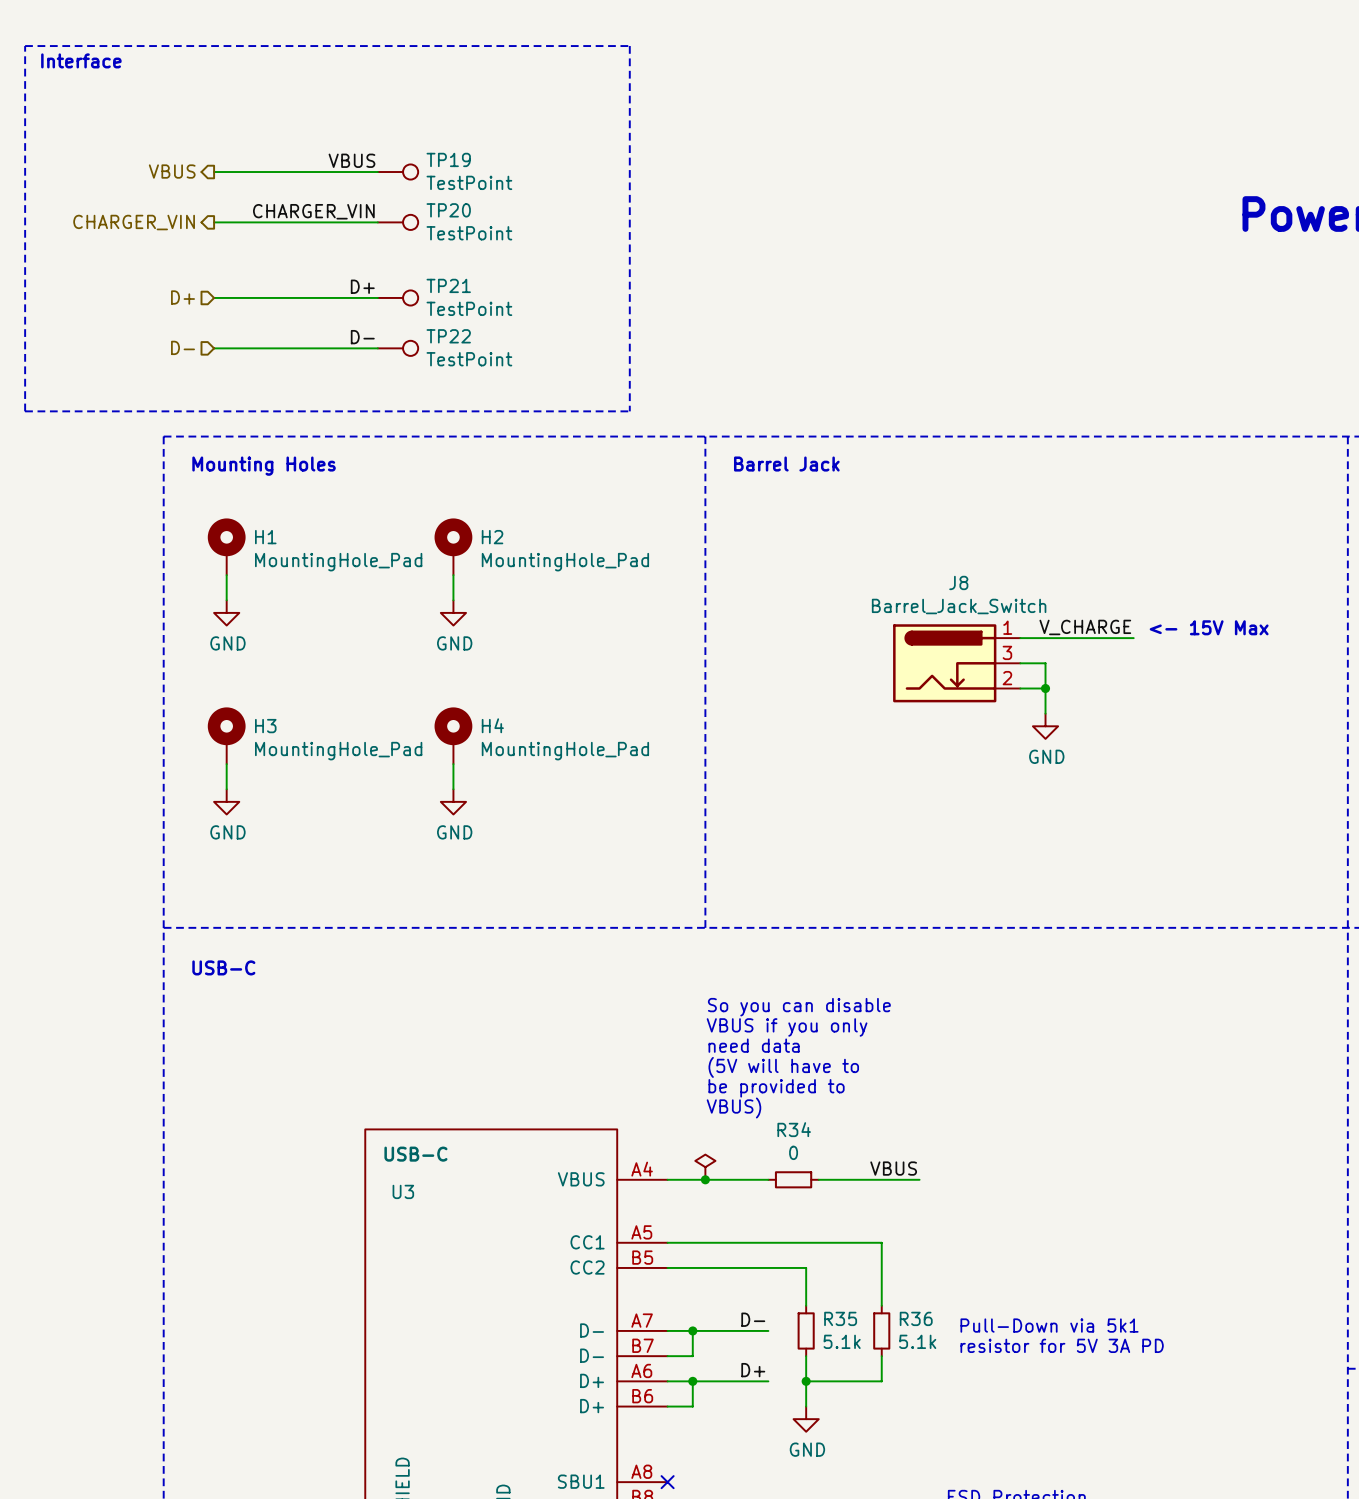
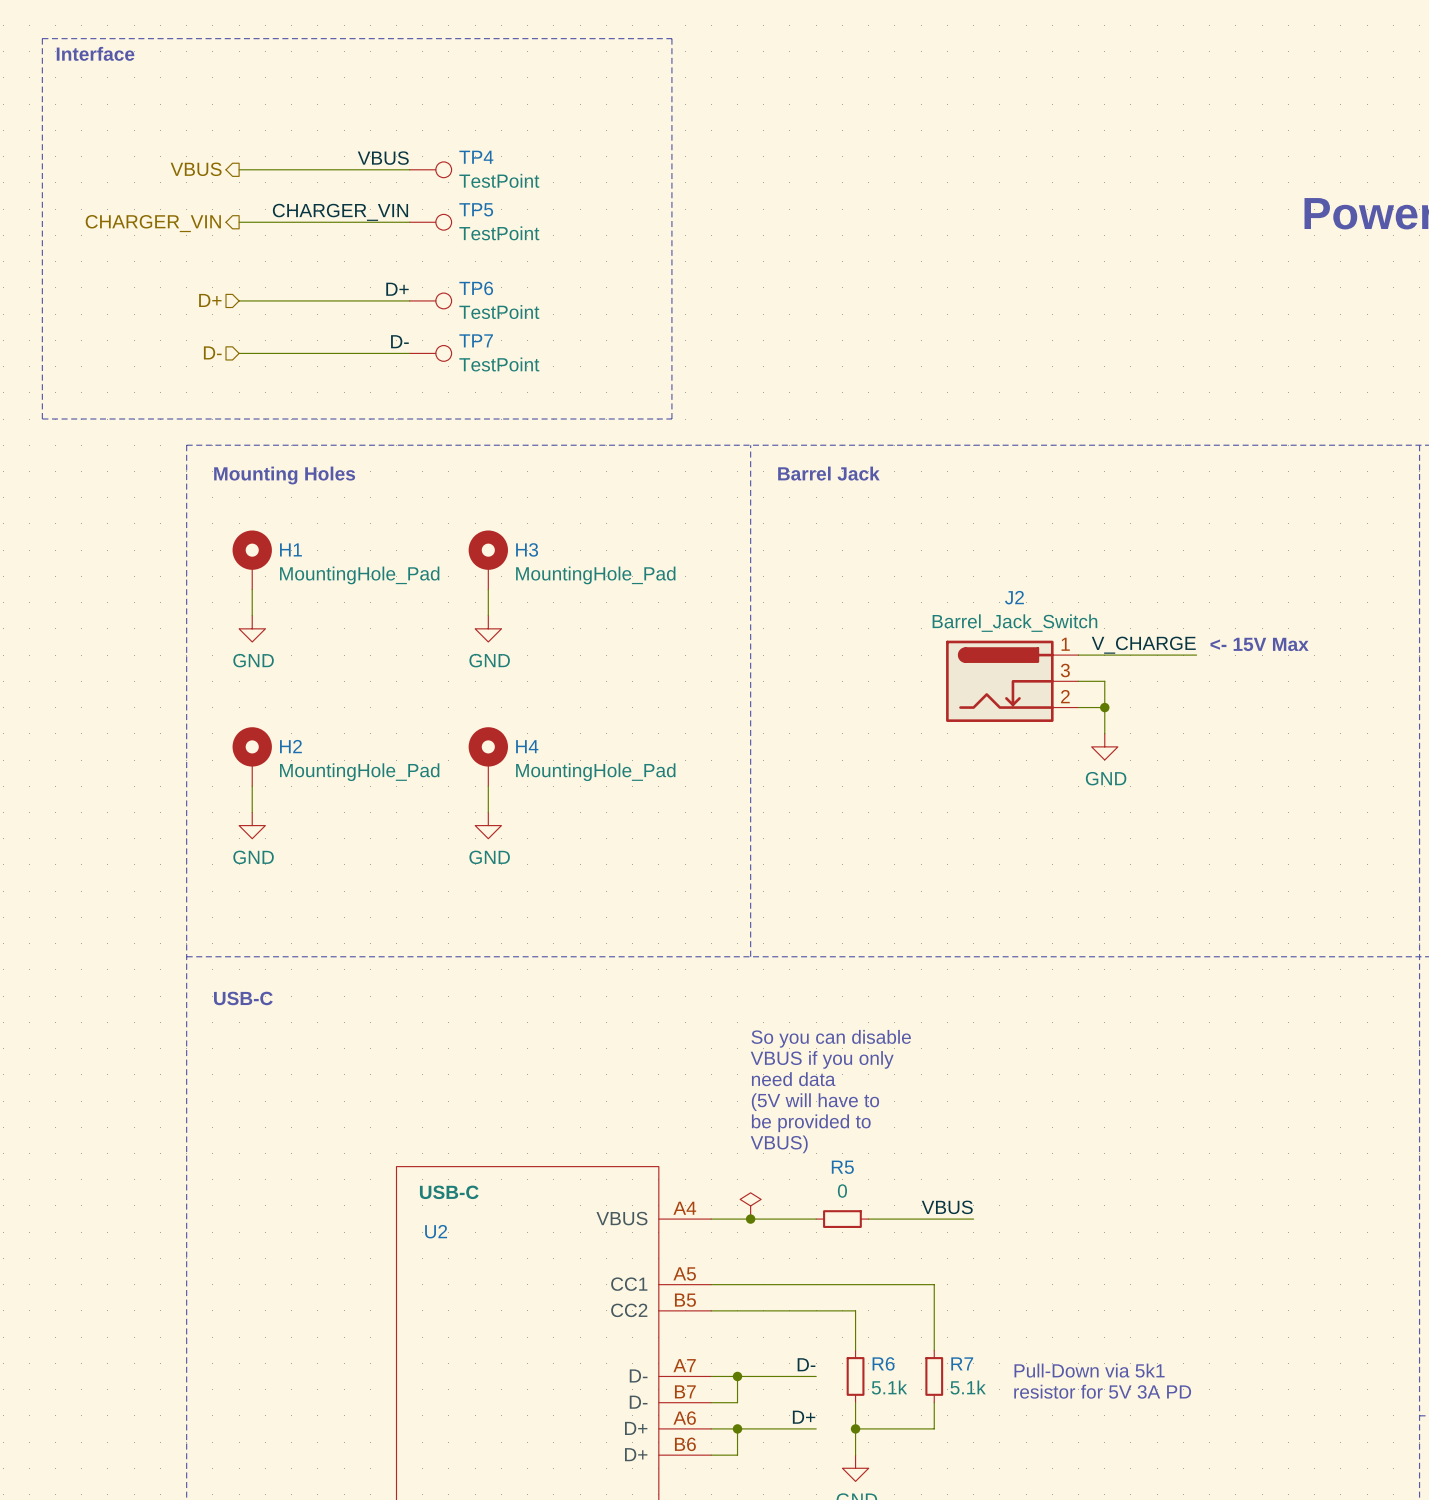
TP19 name: TP19 (448, 159) -> TP4 (476, 157)
TP20 name: TP20 (448, 210) -> TP5 (476, 209)
TP21 name: TP21 (448, 285) -> TP6 (476, 288)
TP22 name: TP22 (448, 336) -> TP7 (476, 340)
H2 name: H2 (492, 537) -> H3 (527, 549)
J8 name: J8 (958, 582) -> J2 (1014, 597)
H3 name: H3 (265, 726) -> H2 (290, 746)
R34 name: R34 (794, 1129) -> R5 (842, 1167)
U3 name: U3 (403, 1191) -> U2 (436, 1231)
R35 name: R35 (840, 1318) -> R6 (883, 1363)
R36 name: R36 (916, 1318) -> R7 (962, 1363)

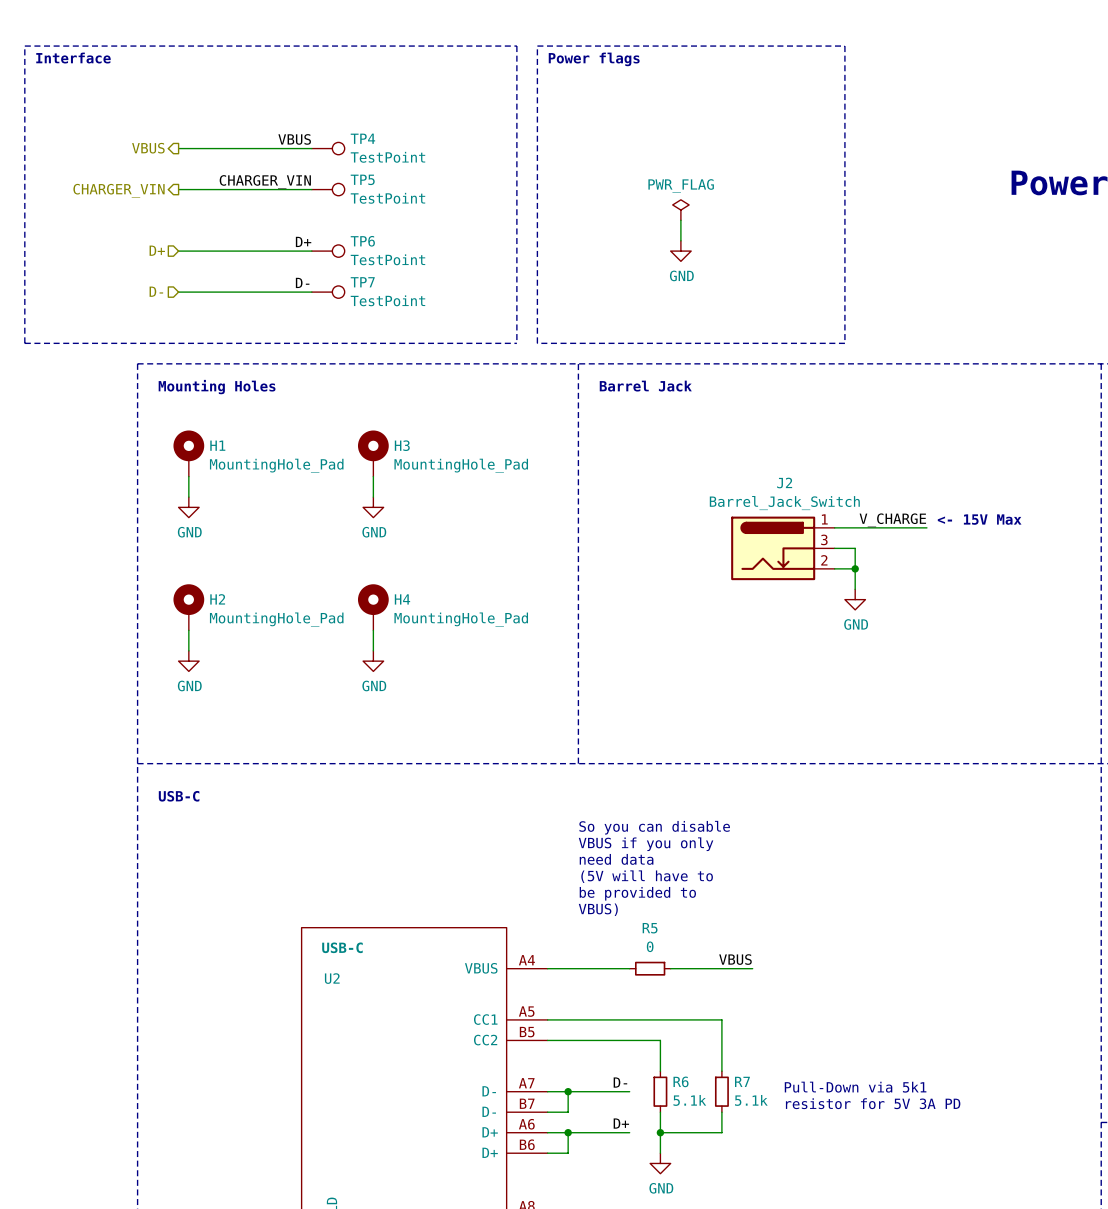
line: none -> (537, 46) (844, 46) (844, 343) (537, 343) (537, 46)
text: none -> Power flags (594, 59)
power symbol: none -> PWR_FLAG (680, 210)
wire: none -> (680, 220) (680, 240)
power symbol: none -> GND (680, 251)
power symbol: (750, 1205) -> none
junction: (750, 1219) -> none

